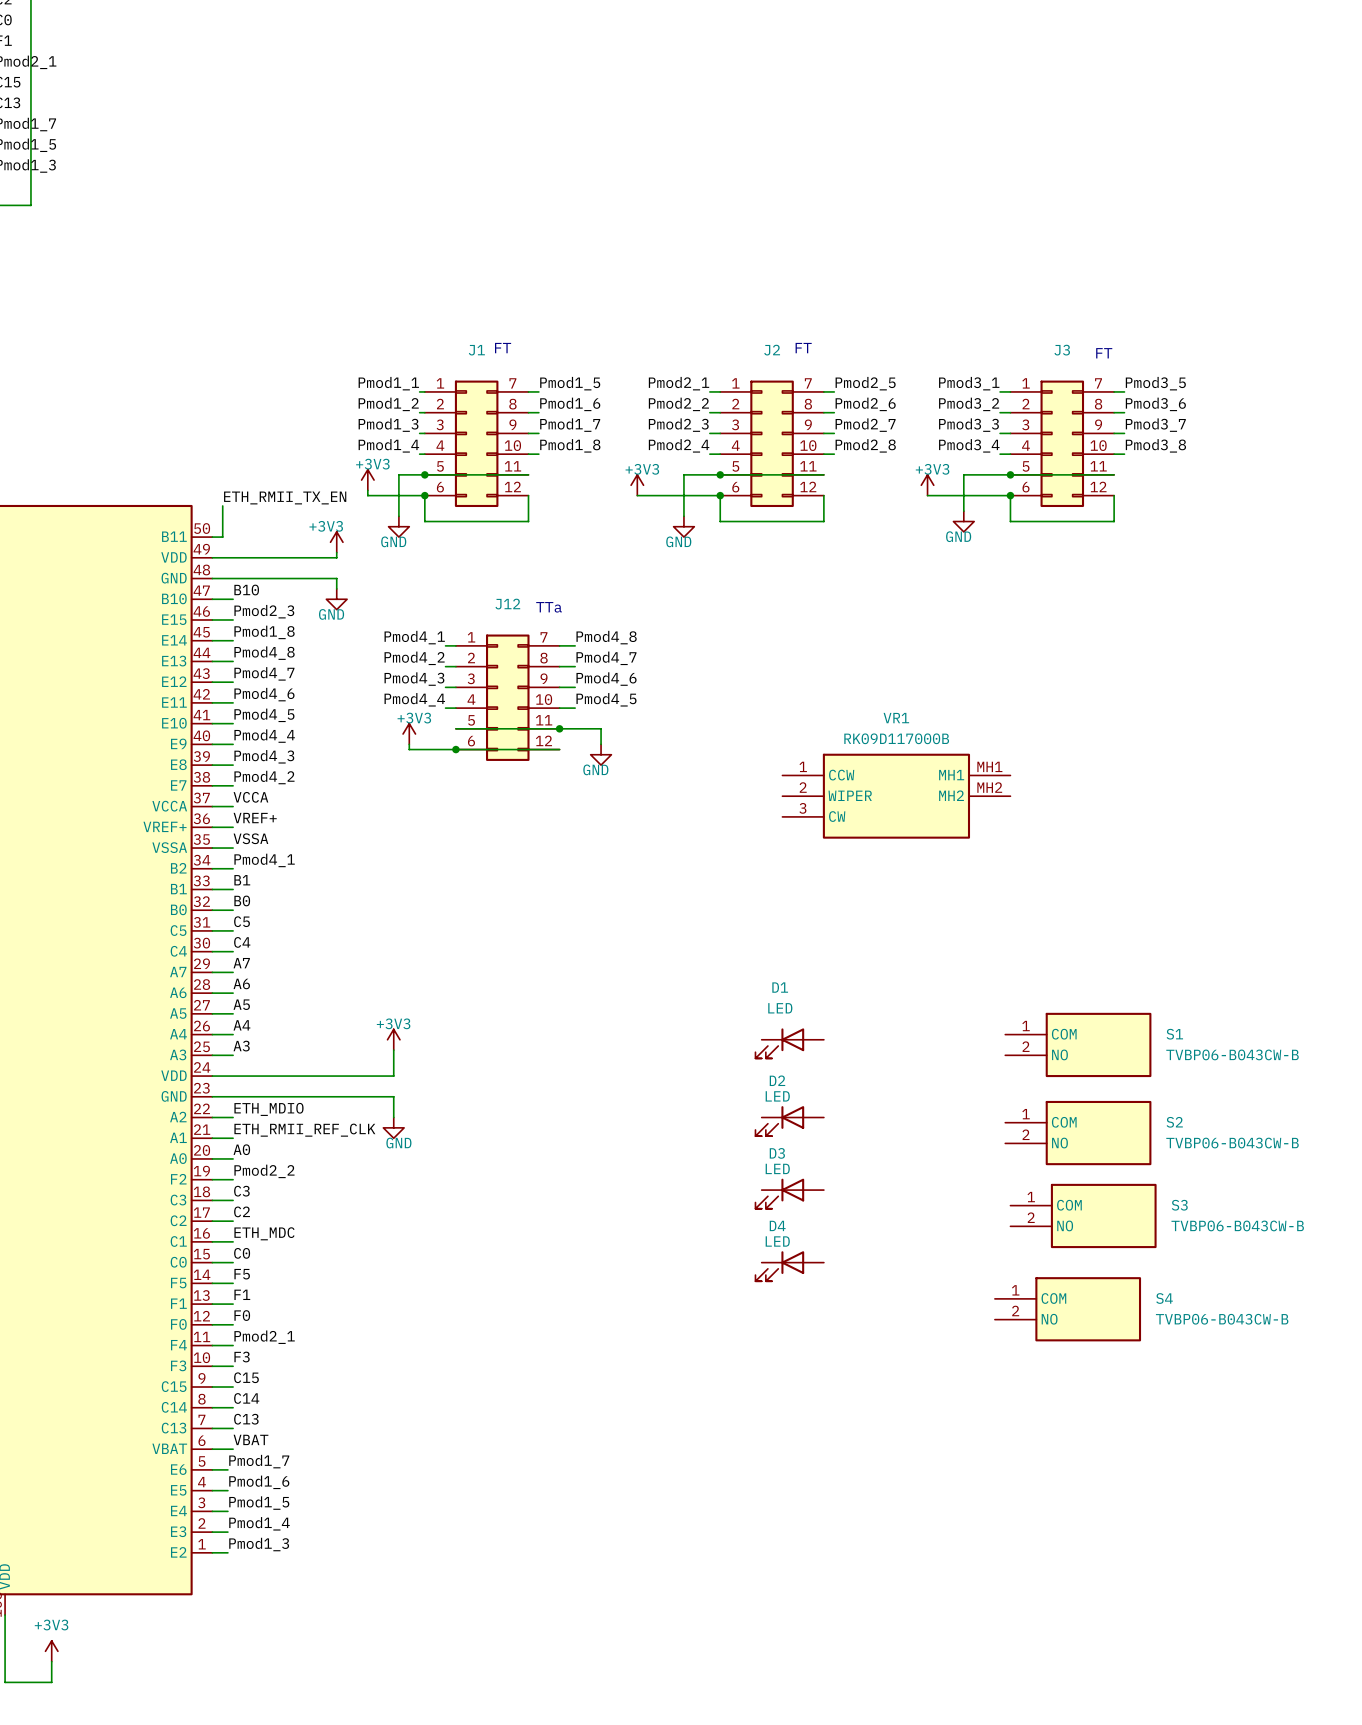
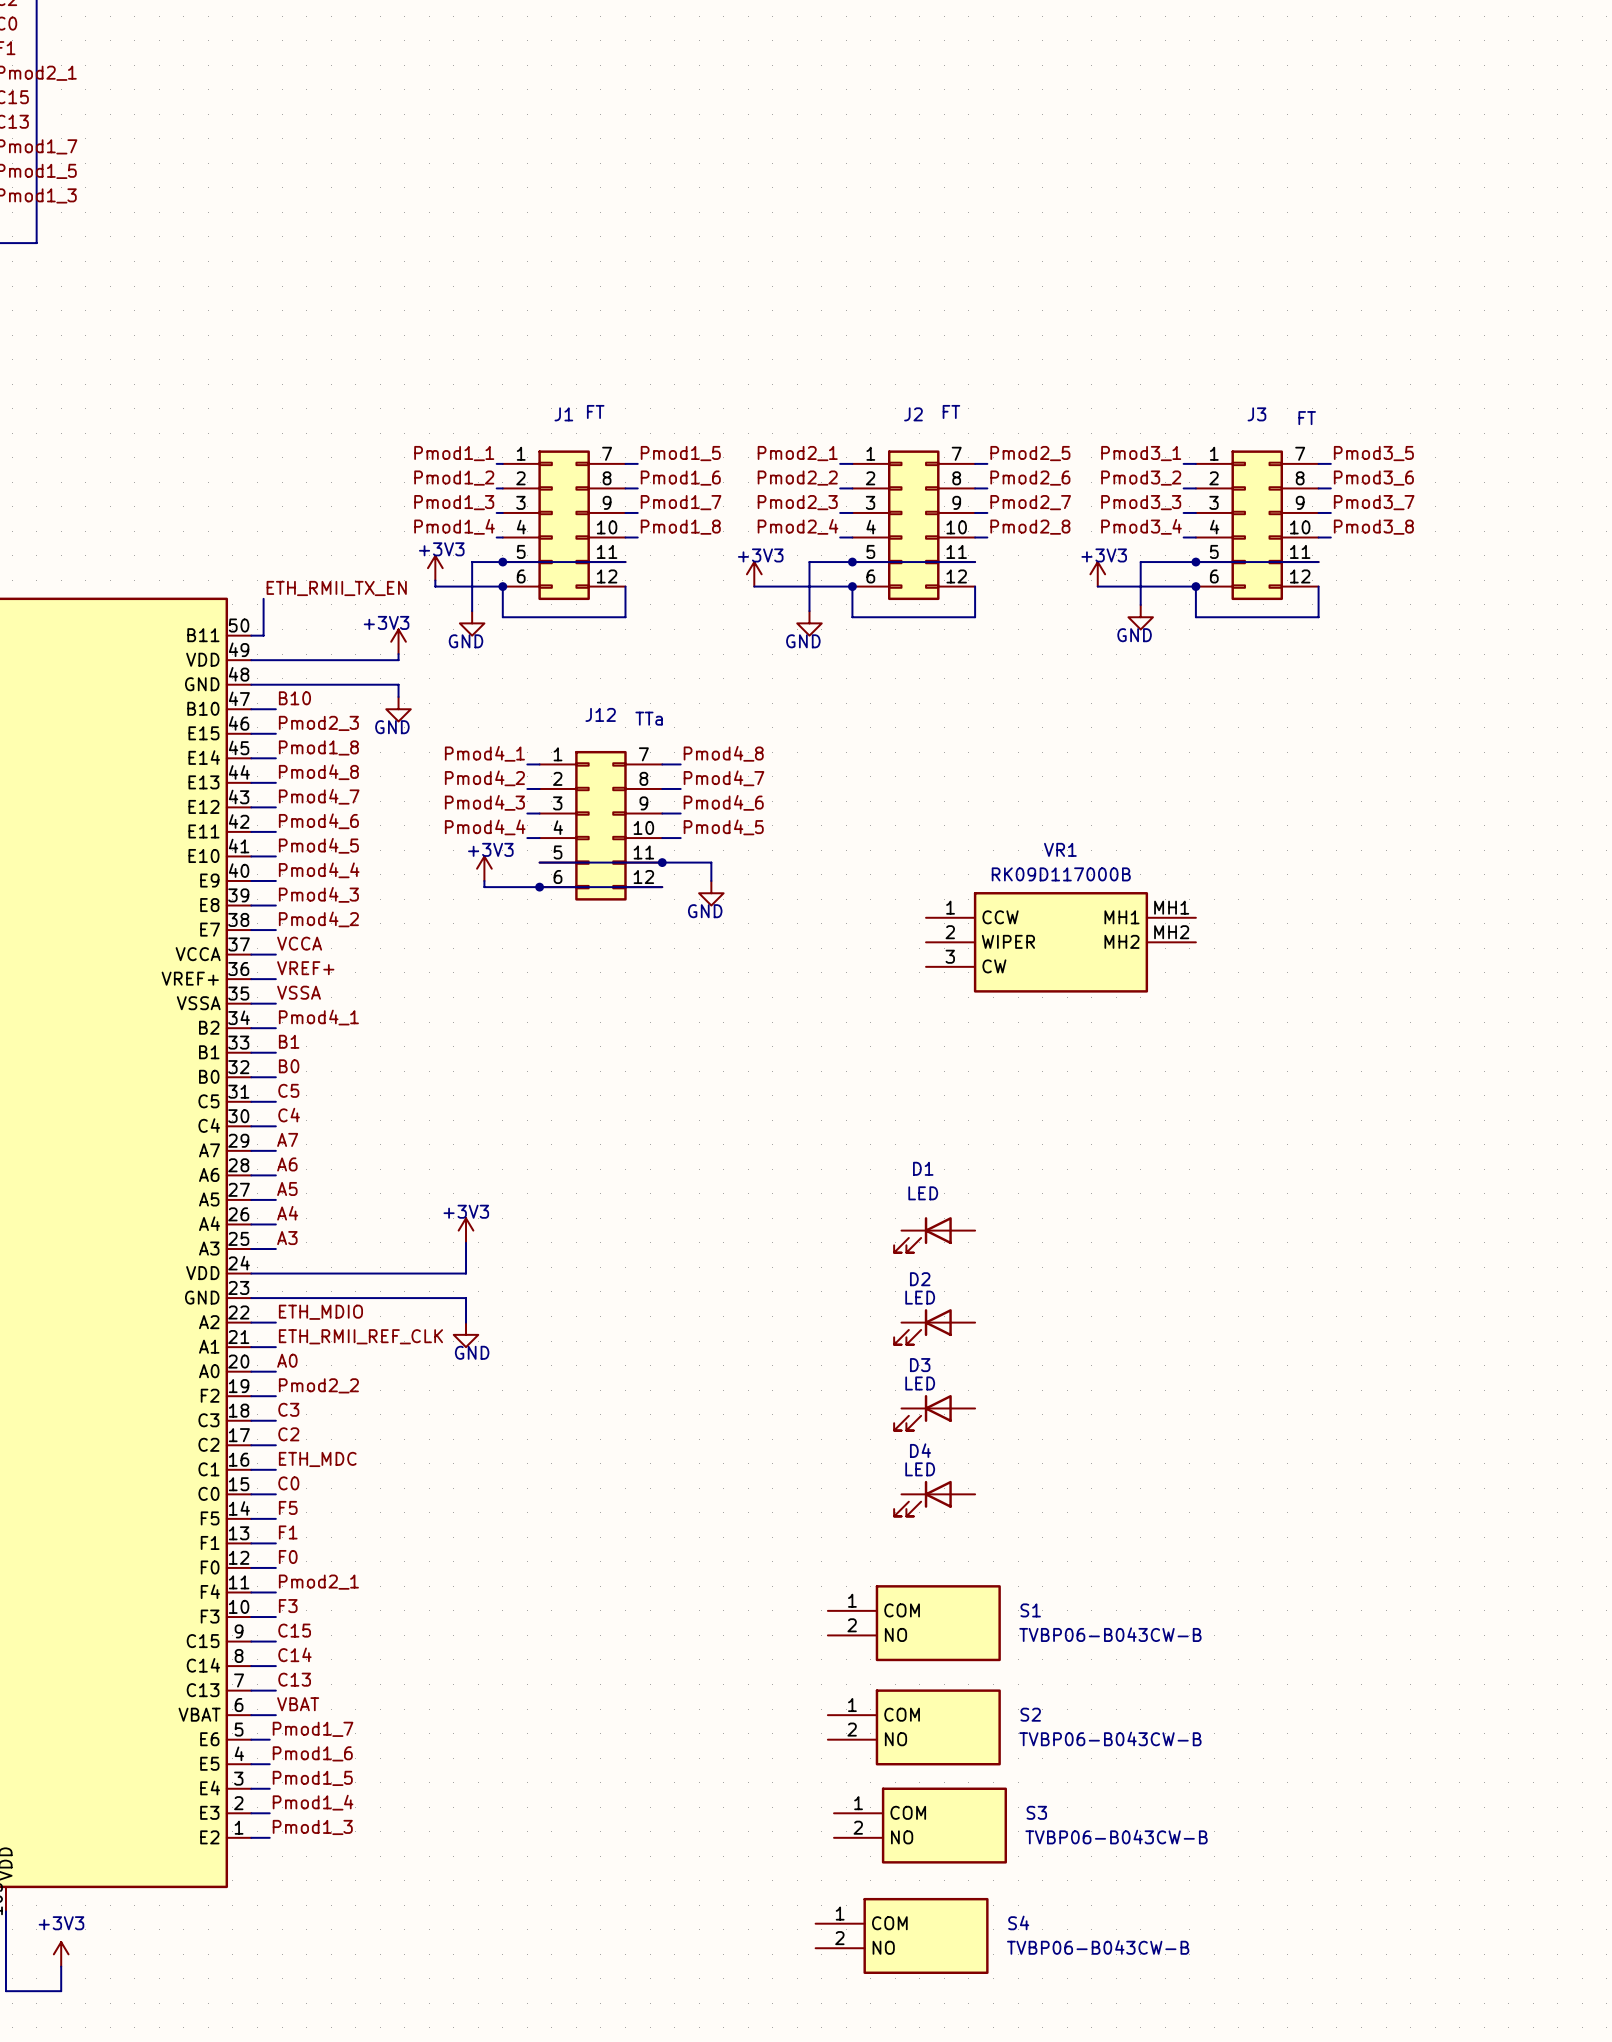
S1 position: (1078, 1044) -> (914, 1623)
S2 position: (1078, 1133) -> (914, 1727)
S3 position: (1083, 1215) -> (920, 1825)
S4 position: (1067, 1309) -> (902, 1935)

